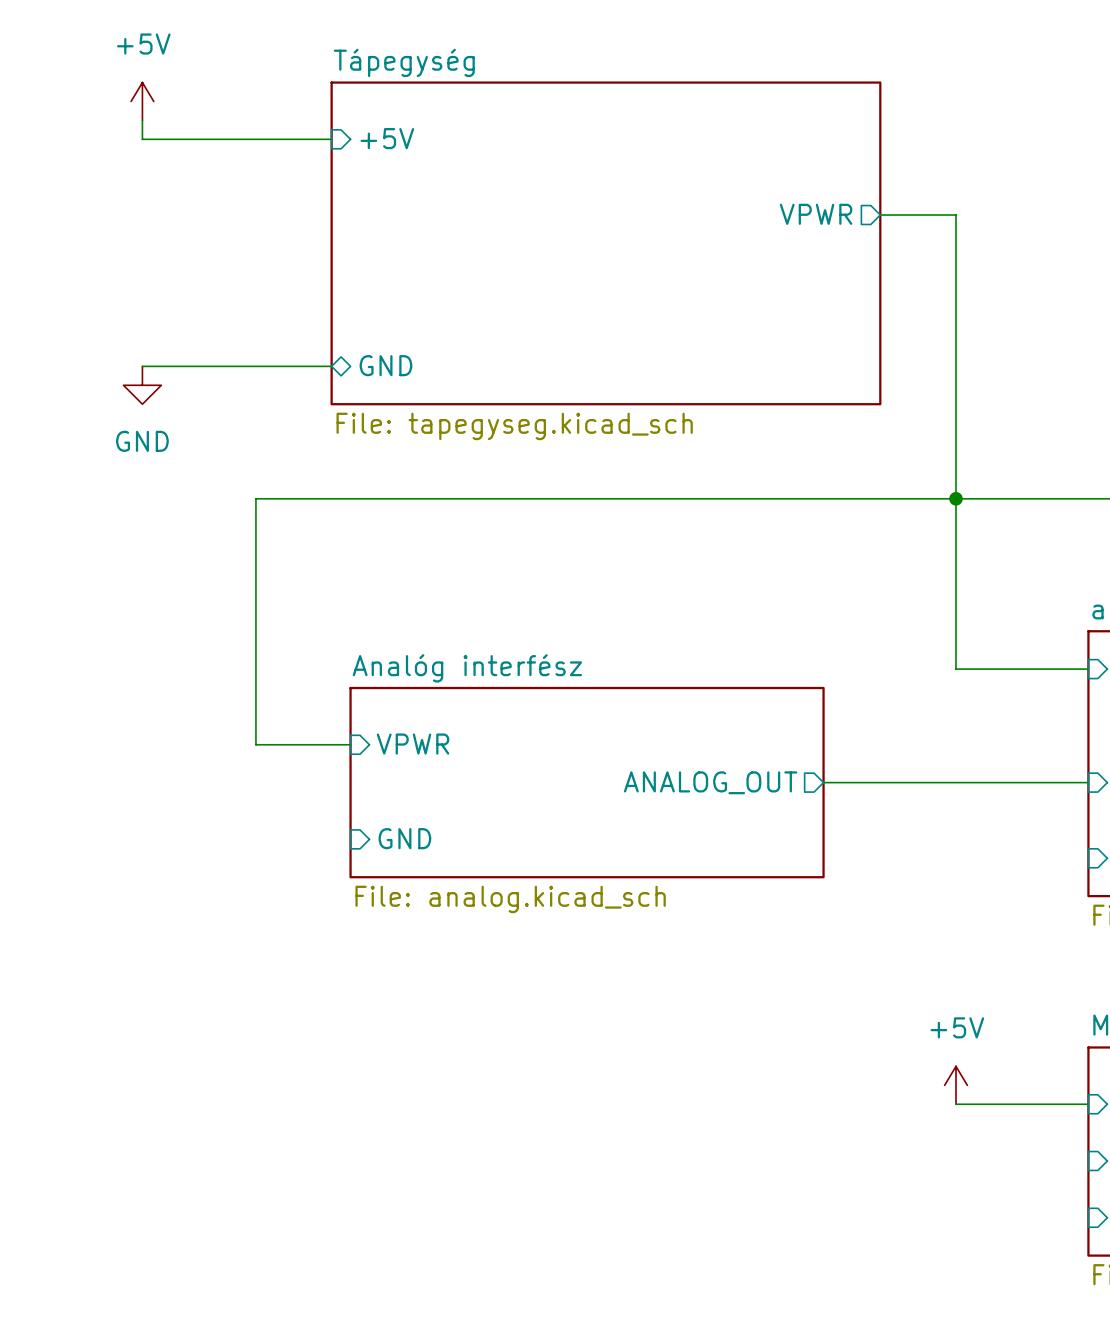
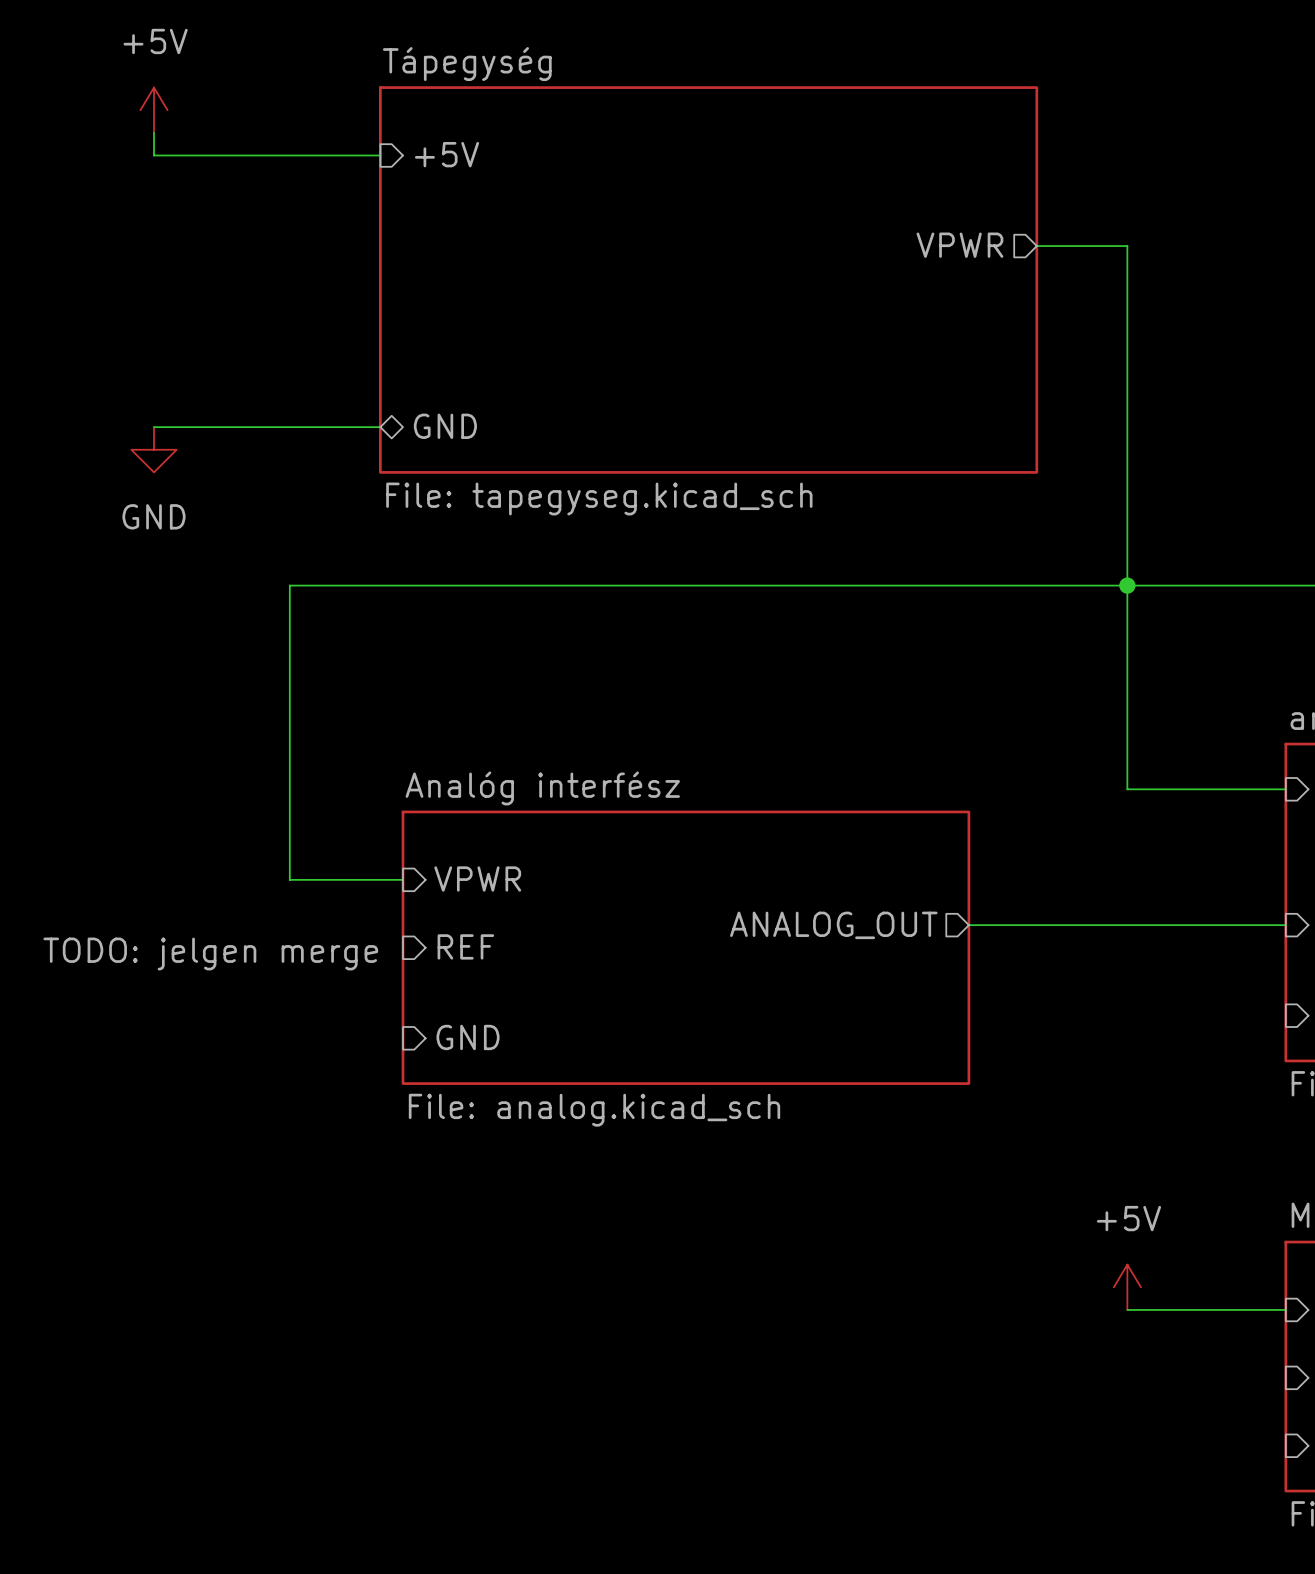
sheet Analóg interfész: File: analog.kicad_sch (587, 782) -> none
sheet pin: none -> REF (465, 946)
sheet Analóg interfész: none -> File: analog.kicad_sch (685, 947)
label: none -> TODO: jelgen merge (210, 953)
sheet pin position: GND (404, 838) -> GND (468, 1037)

